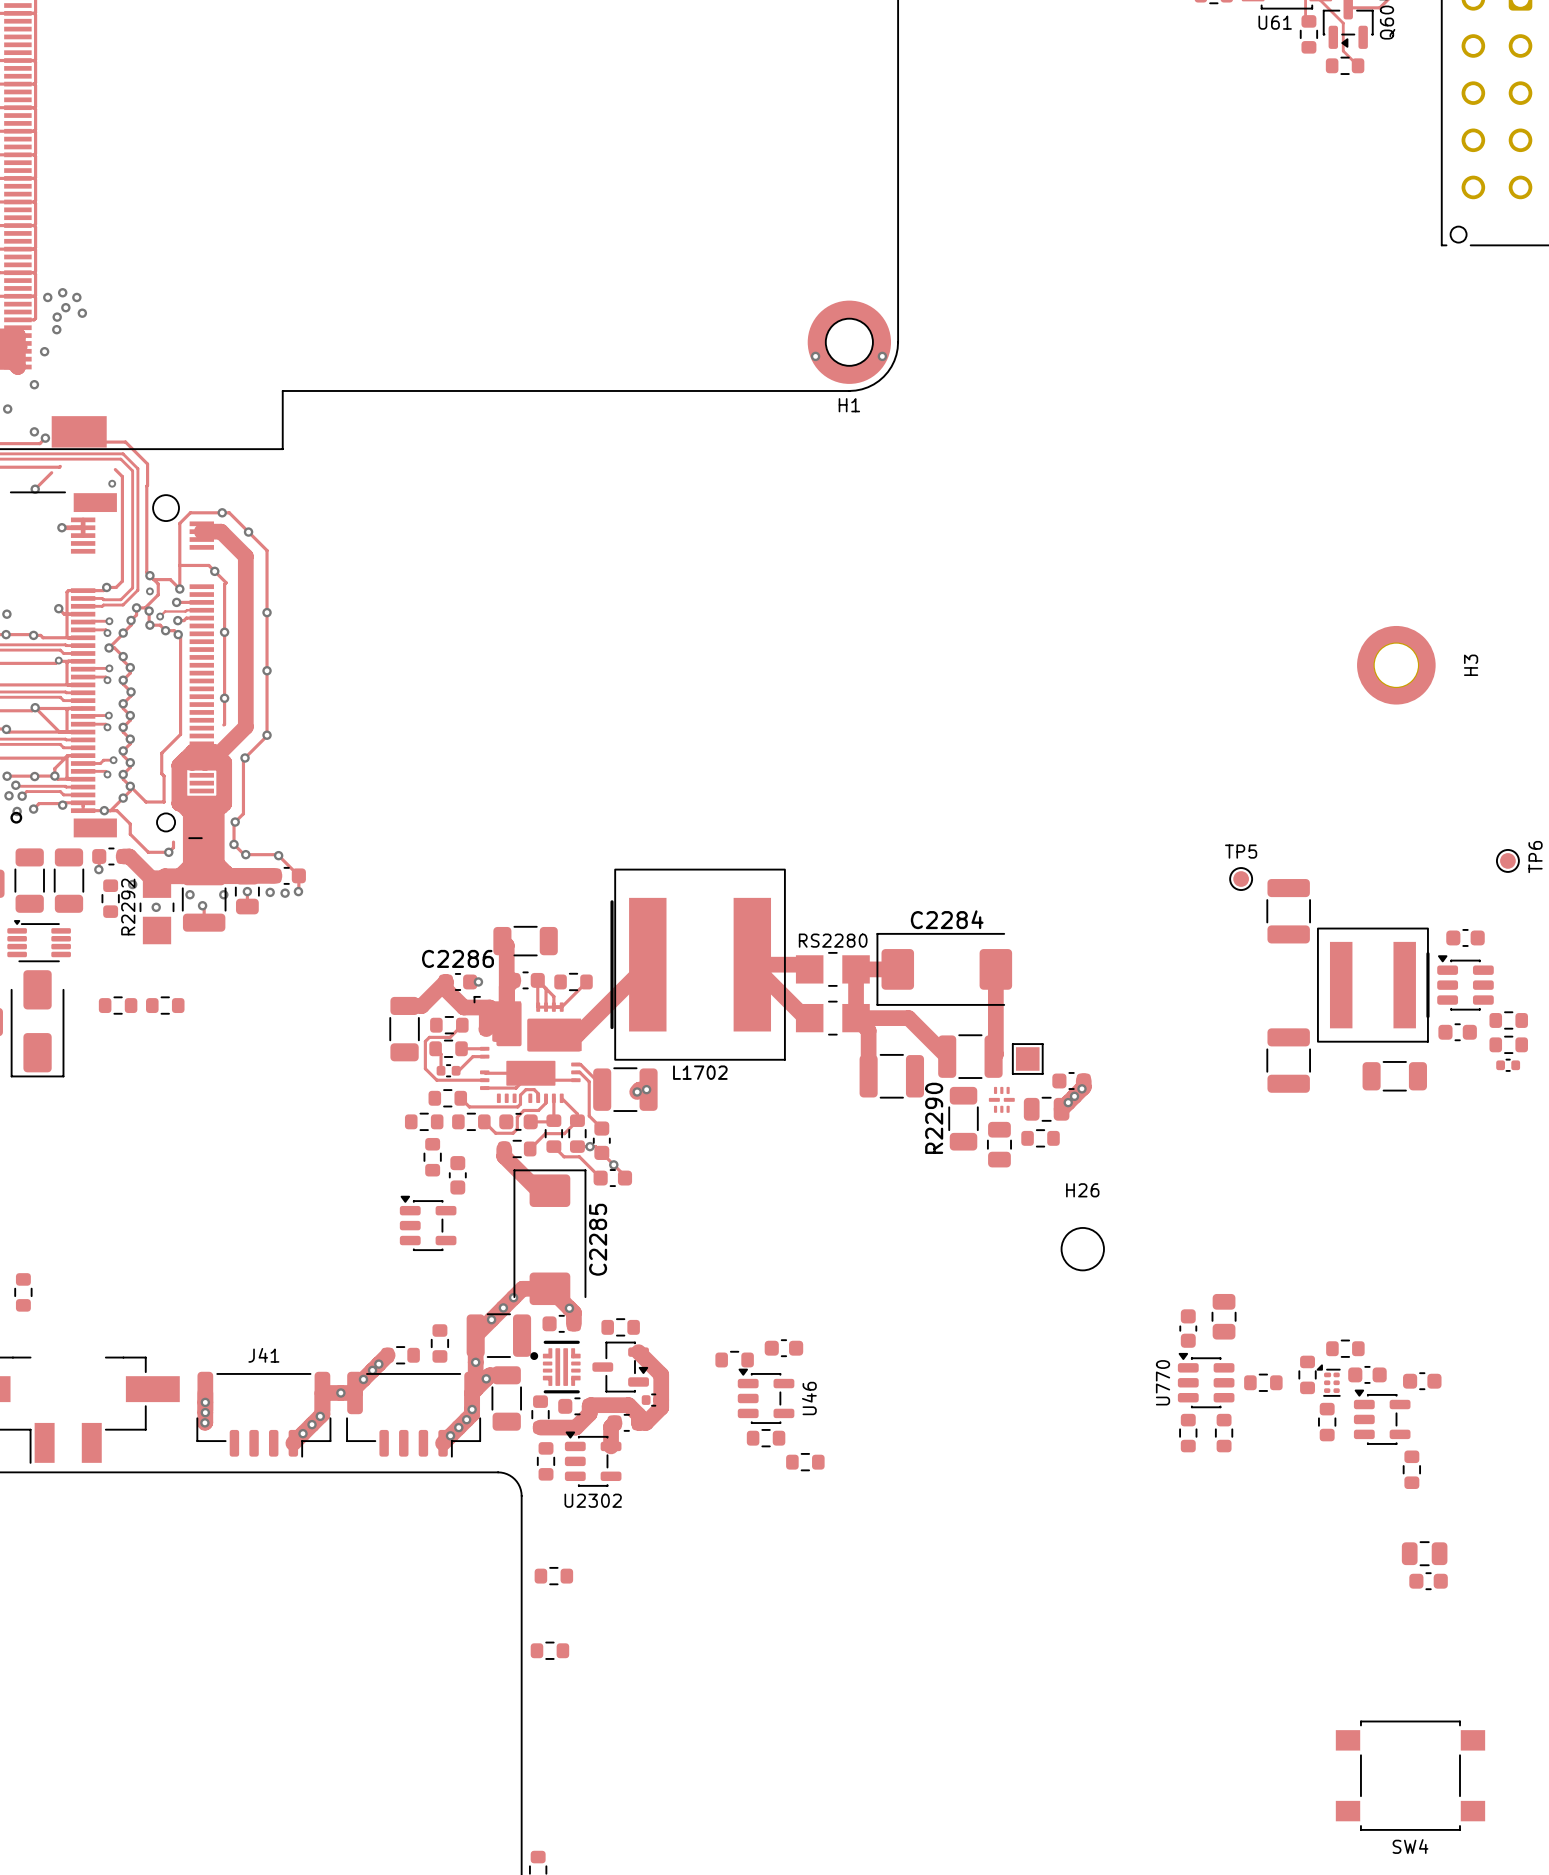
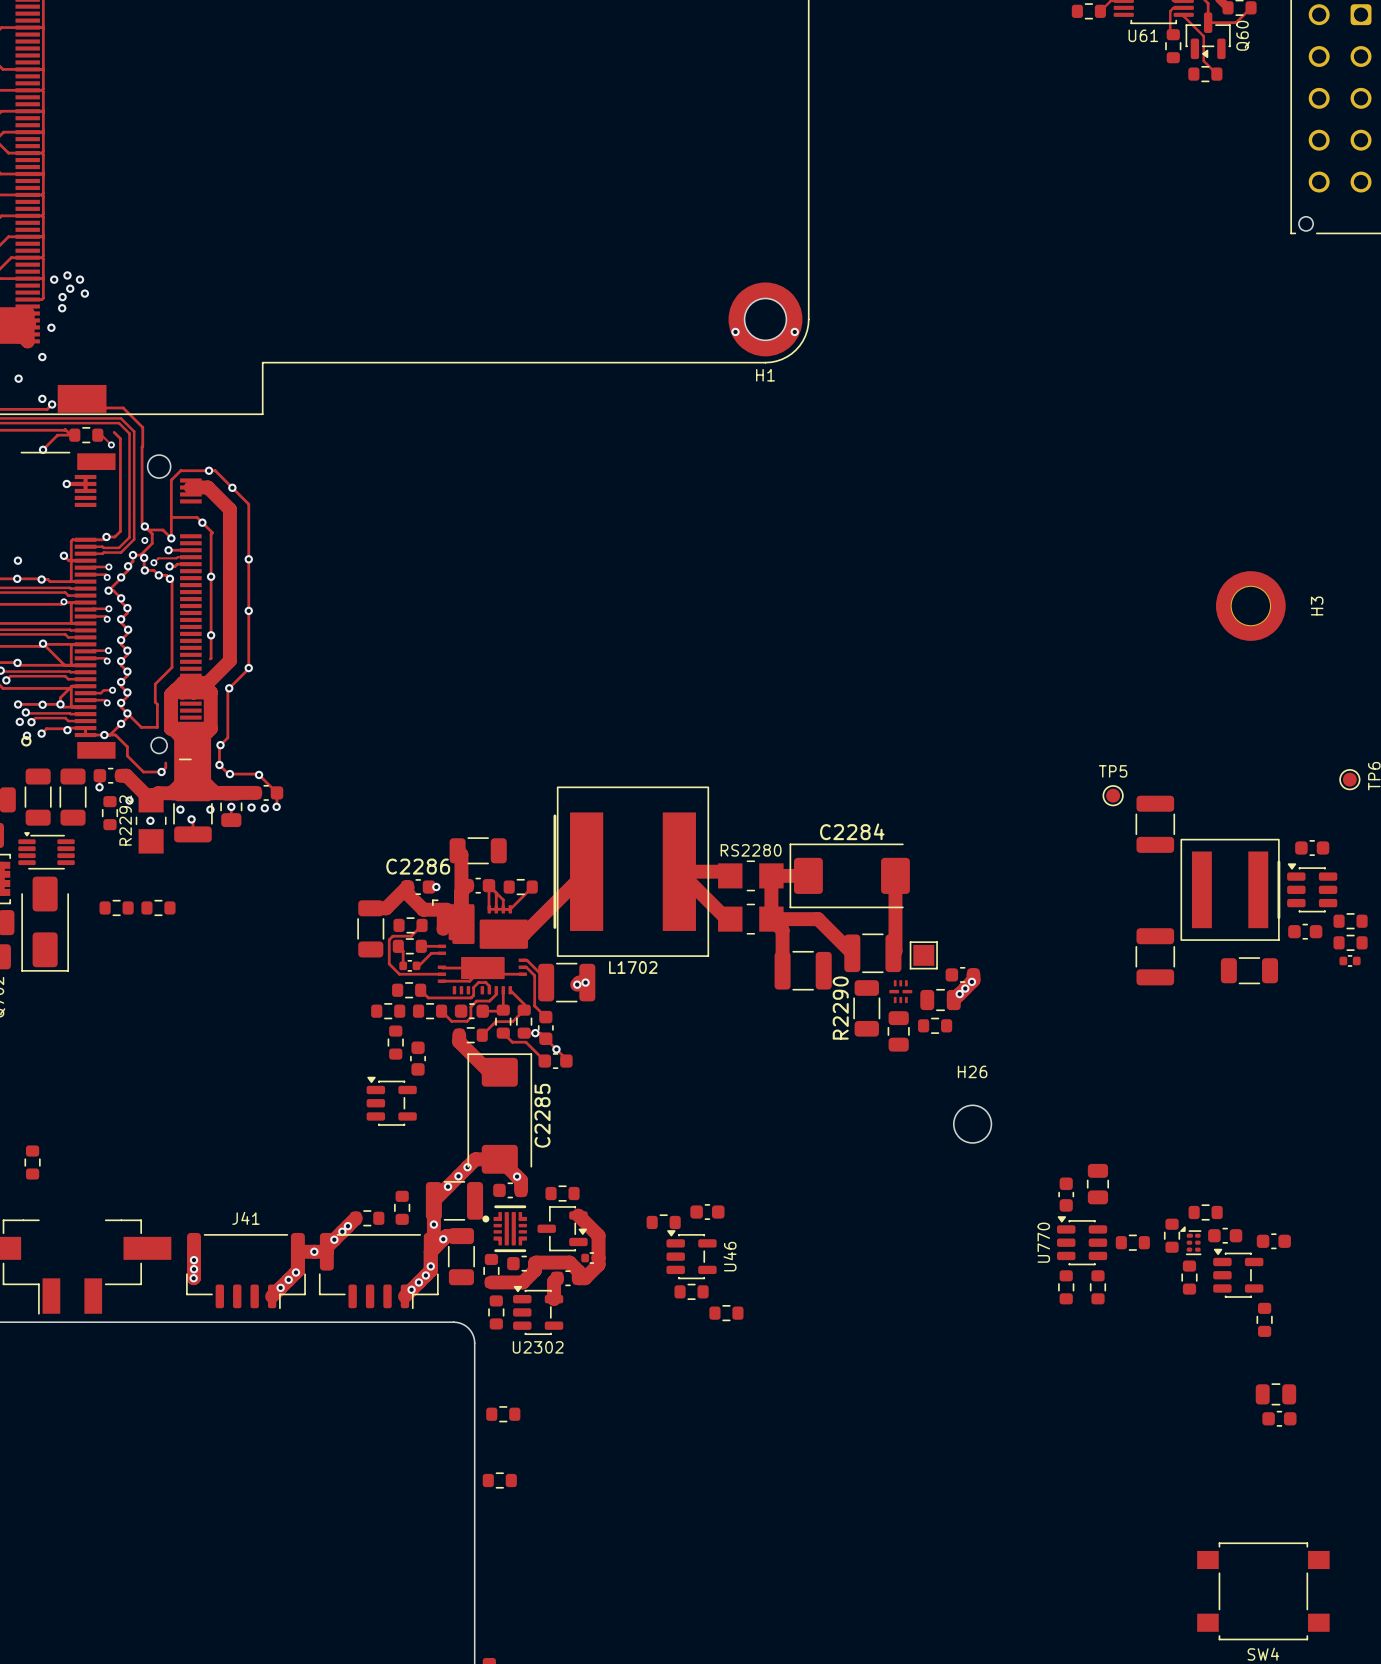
track: none -> (65, 429) (70, 435)
track: none -> (57, 435) (74, 435)
part: none -> (86, 435)
track: none -> (97, 435) (101, 435) (111, 444)

